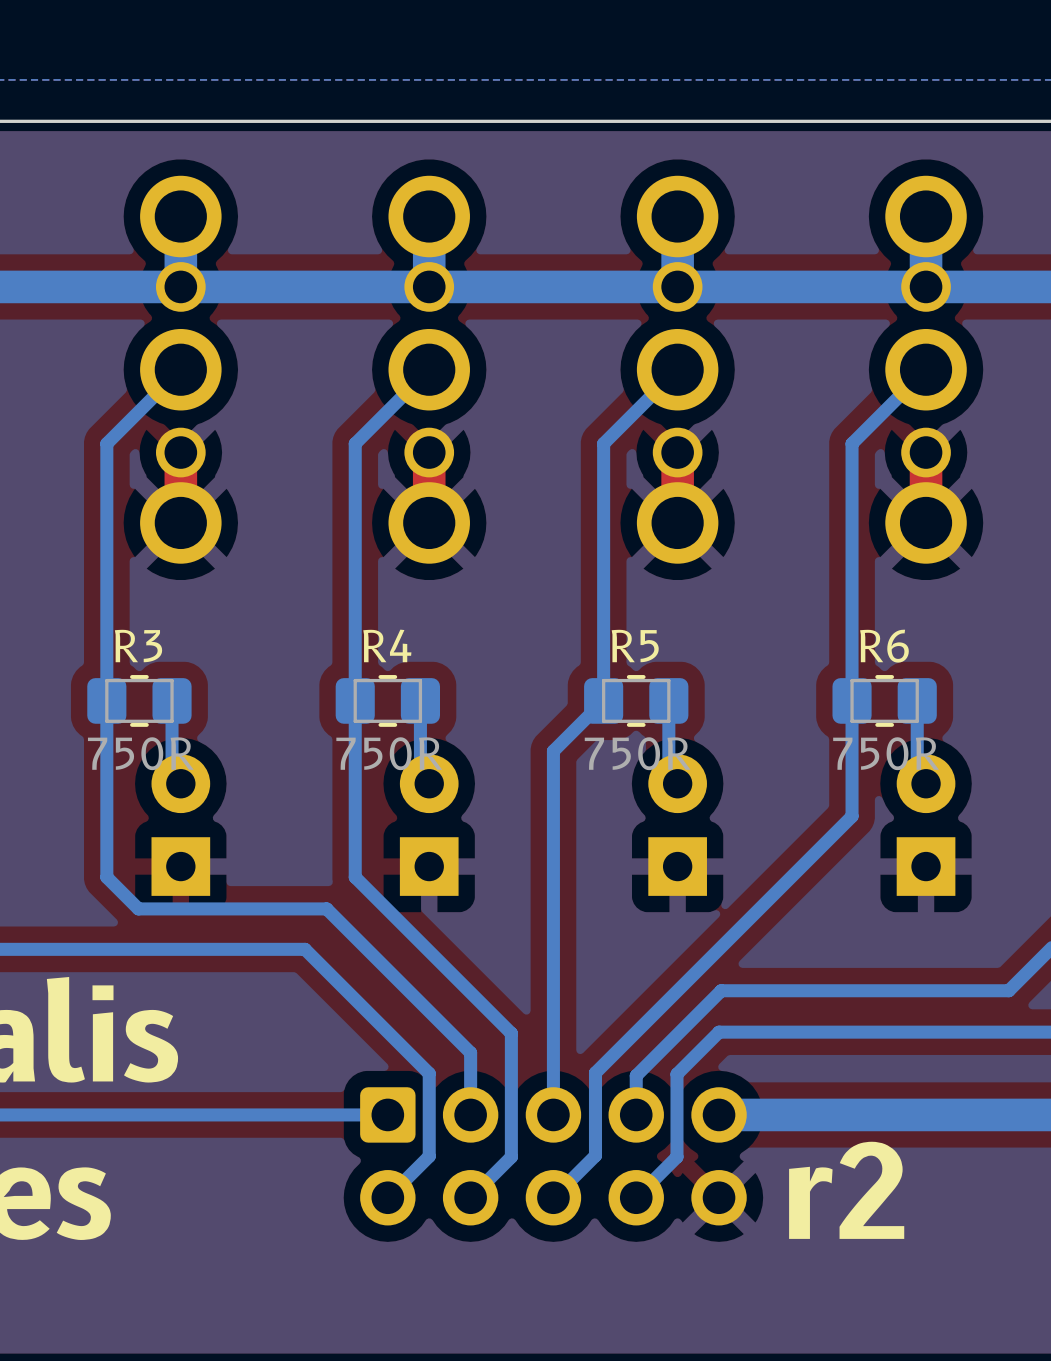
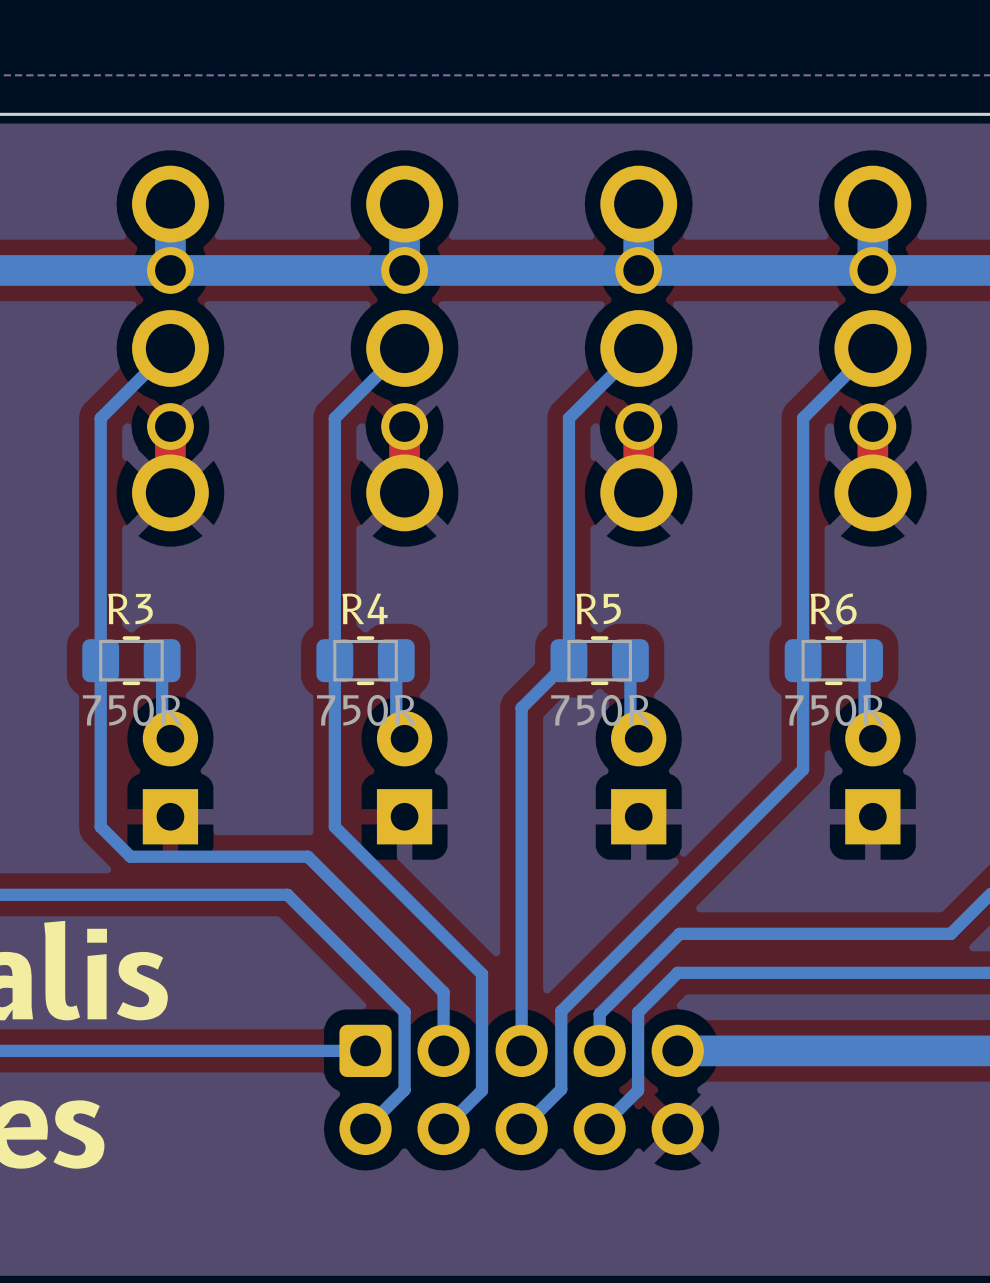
text: r2 (846, 1190) -> none

